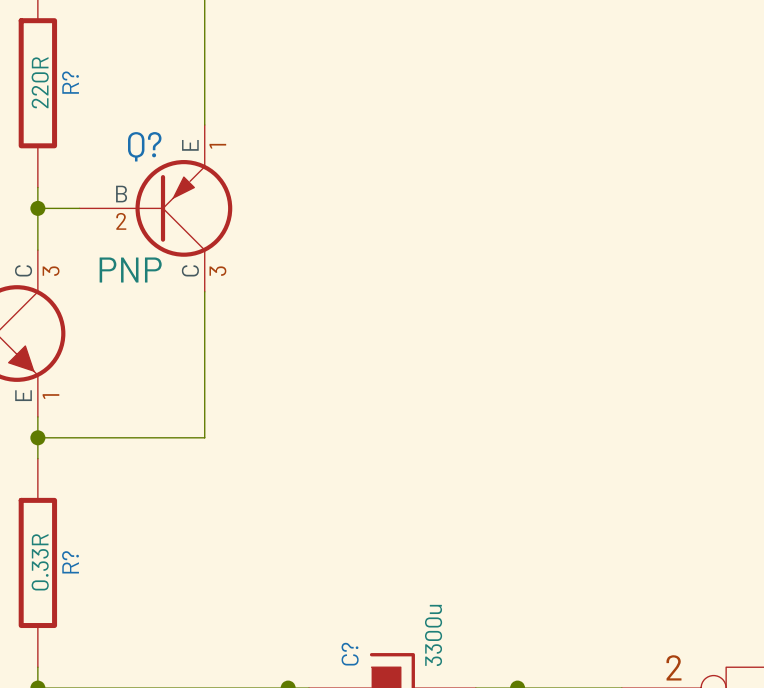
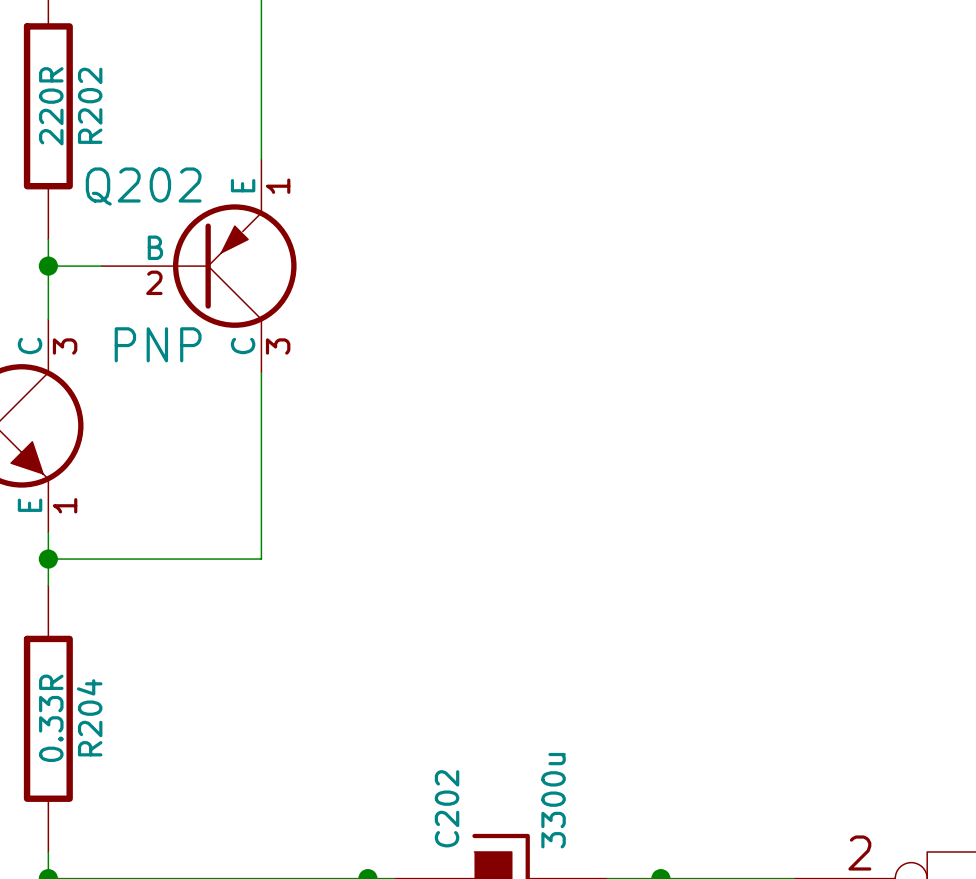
R? name: R? (70, 82) -> R202 (90, 105)
Q? name: Q? (144, 146) -> Q202 (143, 186)
R? name: R? (70, 562) -> R204 (89, 717)
C? name: C? (350, 654) -> C202 (447, 808)

